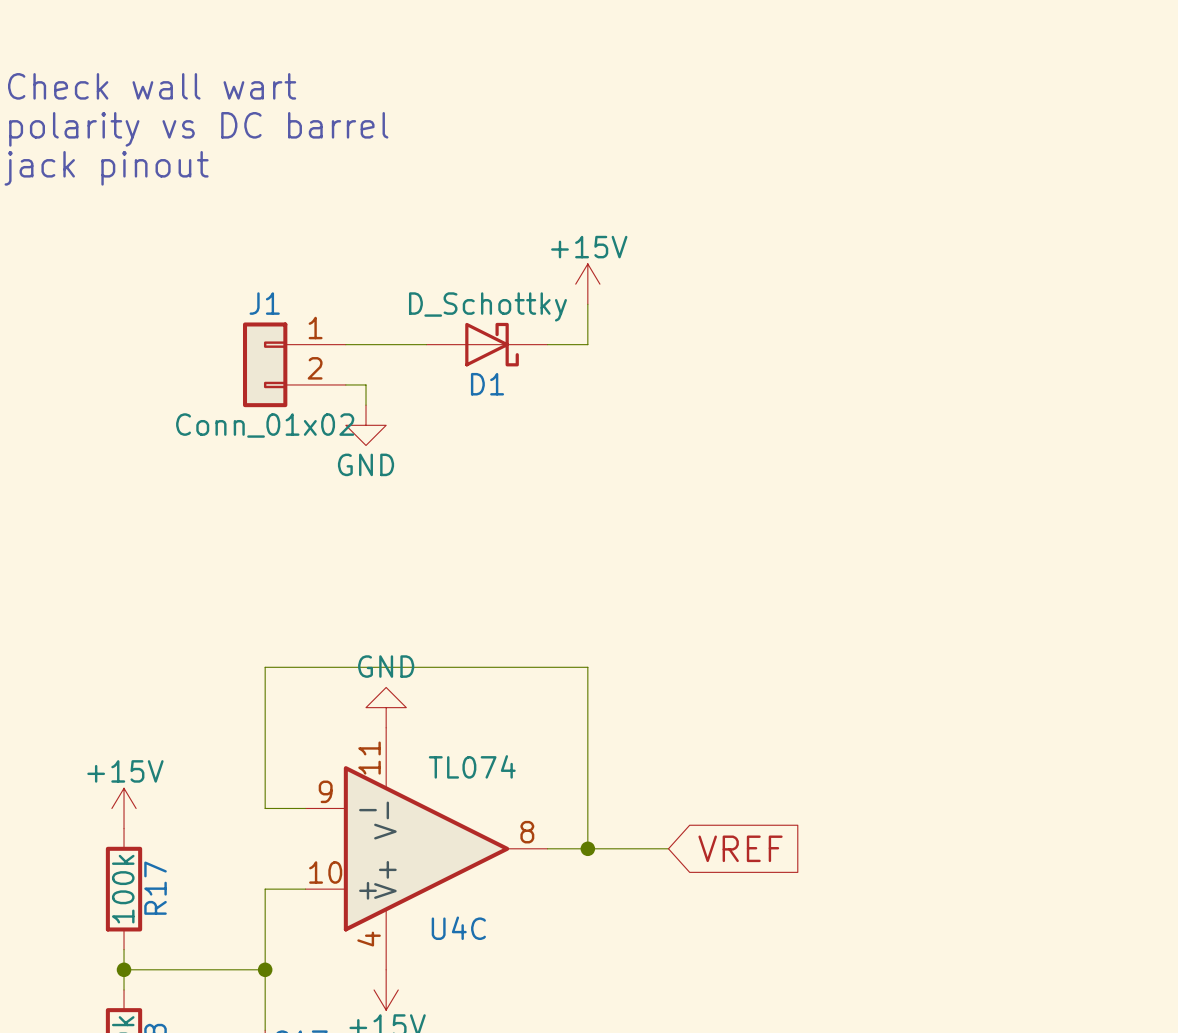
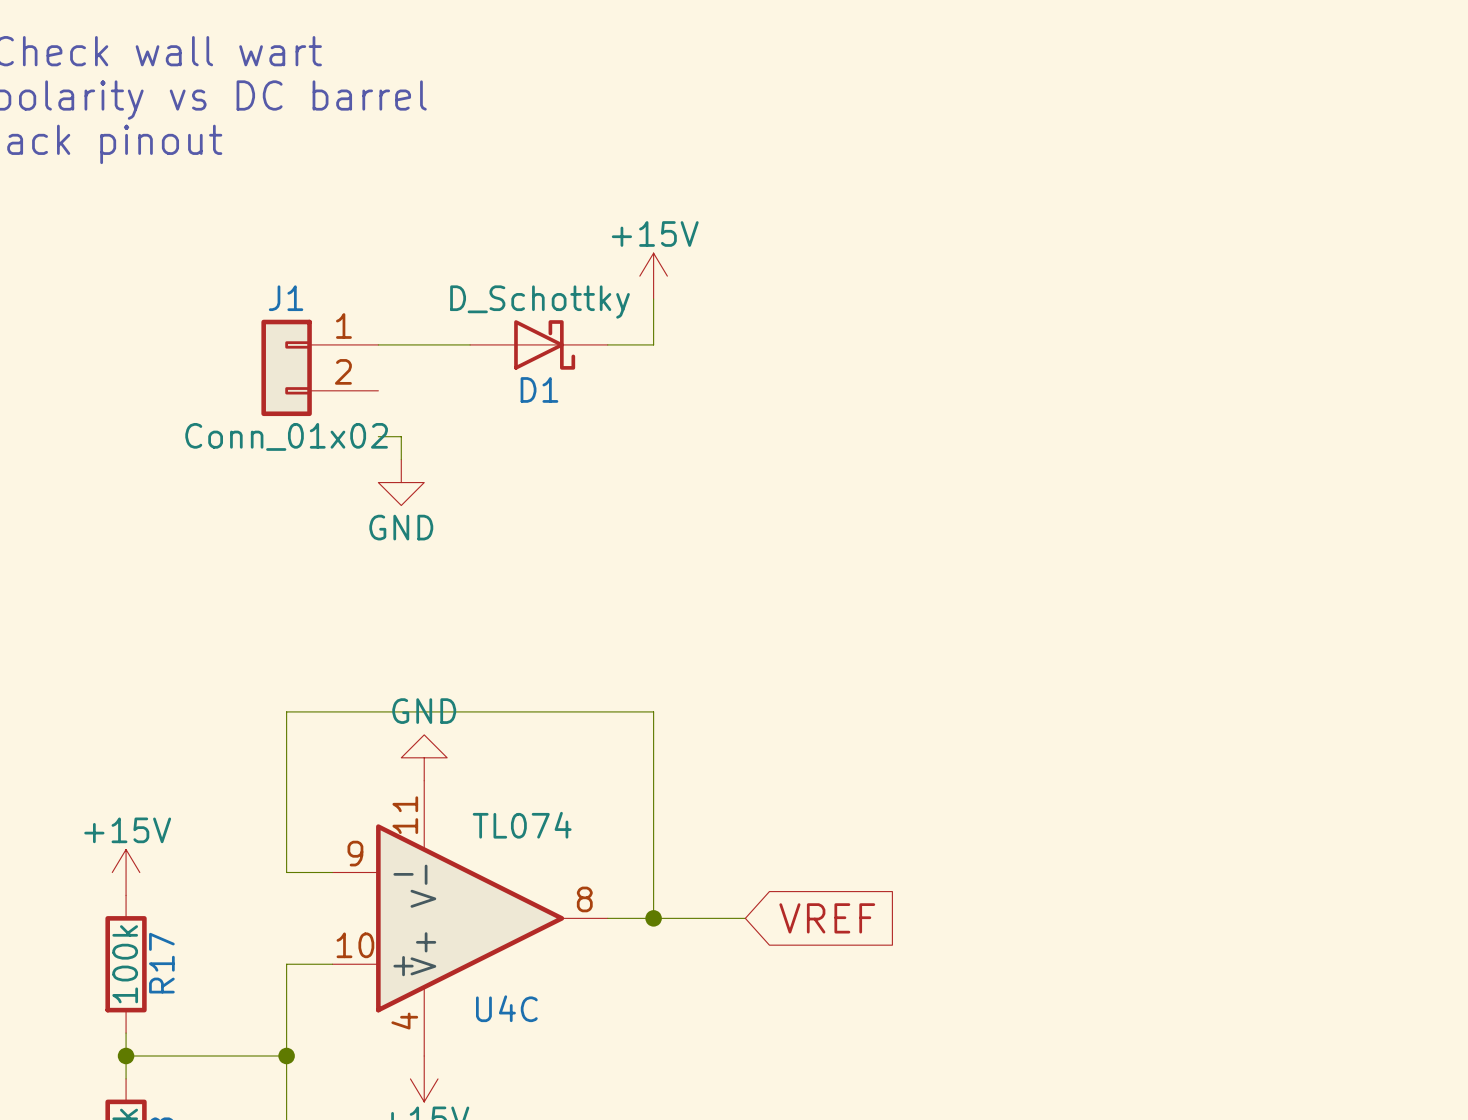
wire: (345, 384) (366, 384) (366, 405) -> (378, 436) (401, 436) (401, 459)
power symbol position: GND (366, 425) -> GND (401, 482)

